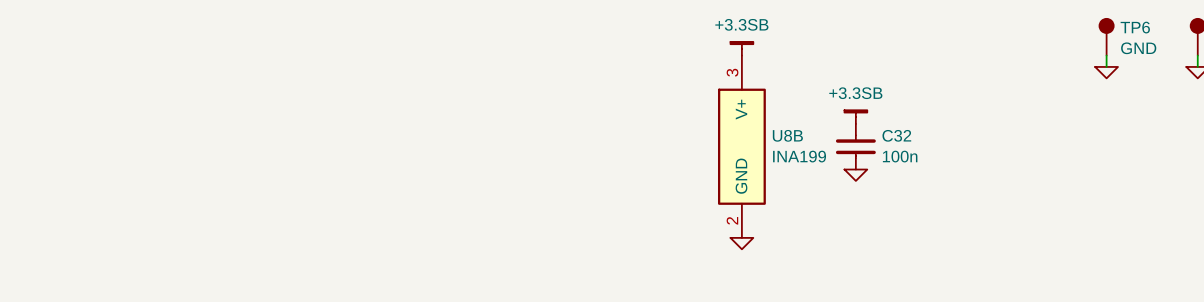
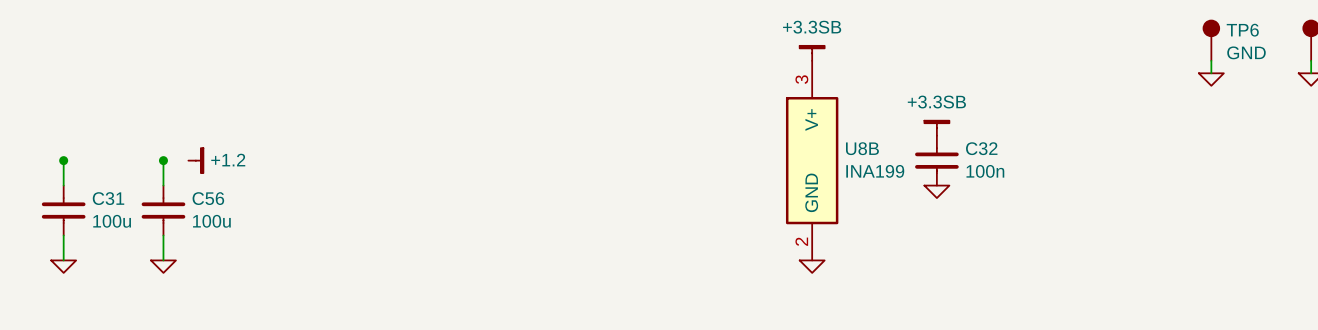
wire: none -> (63, 160) (63, 185)
junction: none -> (63, 160)
wire: none -> (163, 160) (163, 185)
junction: none -> (163, 160)
power symbol: none -> +1.2 (195, 160)
C31: none -> 100u (63, 210)
C56: none -> 100u (163, 210)
wire: none -> (63, 235) (63, 260)
wire: none -> (163, 235) (163, 260)
power symbol: none -> (63, 266)
power symbol: none -> (163, 266)

